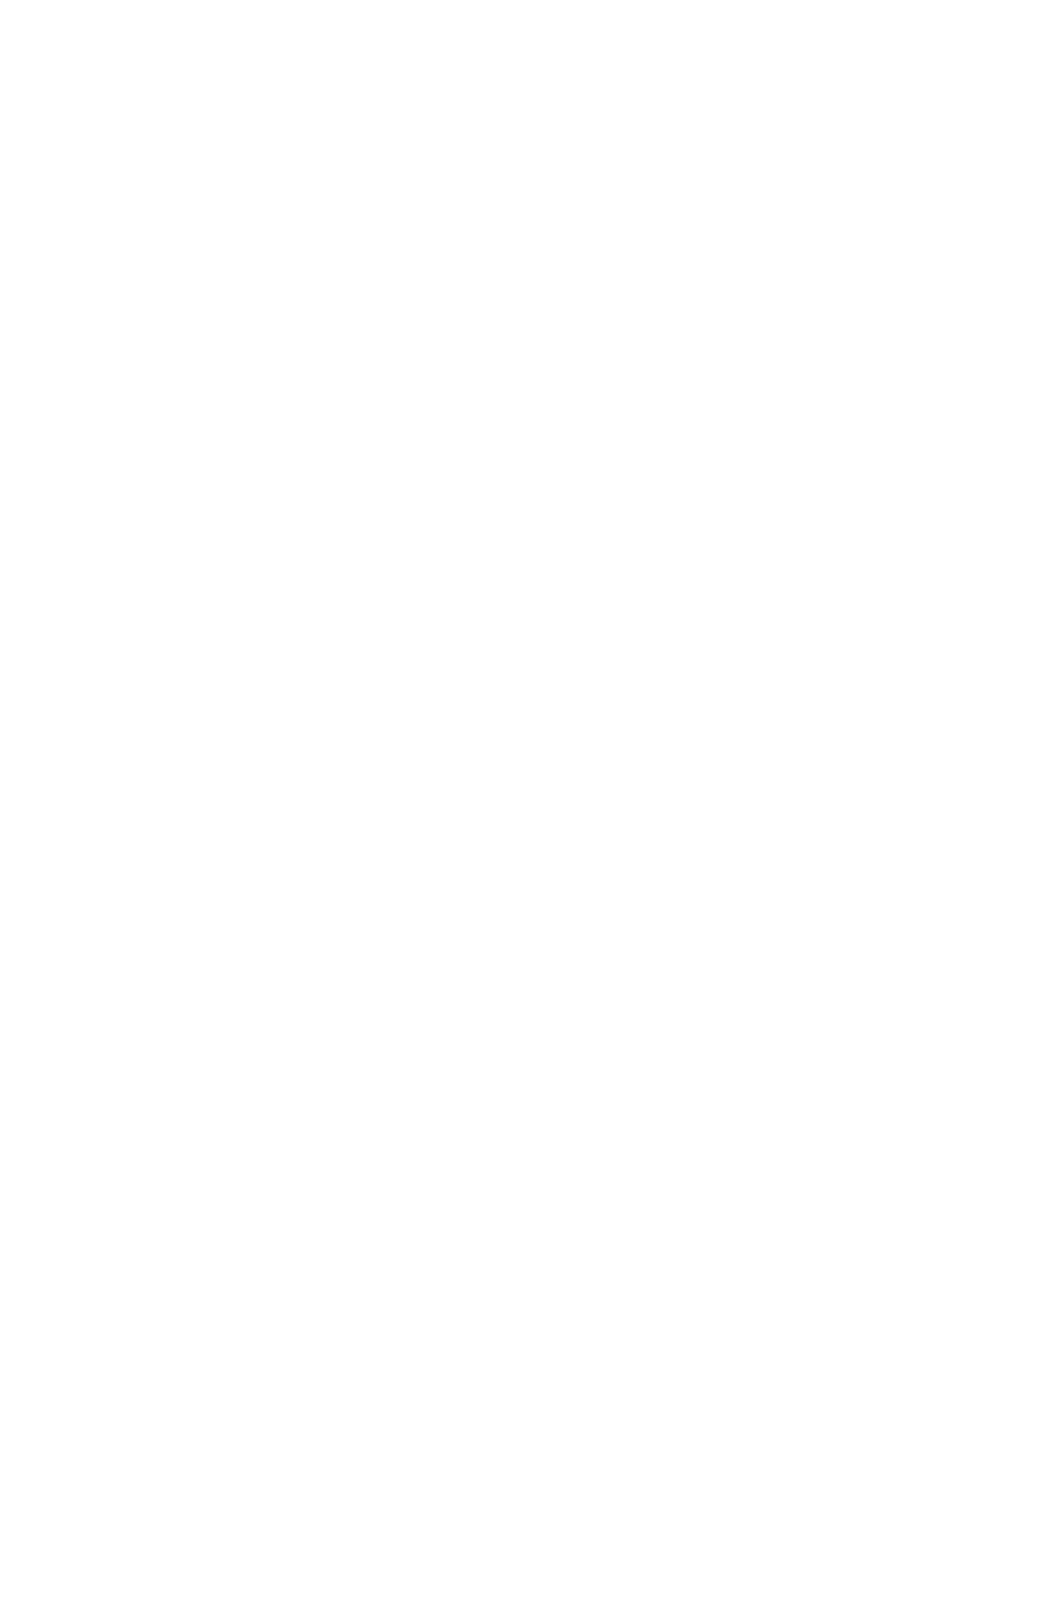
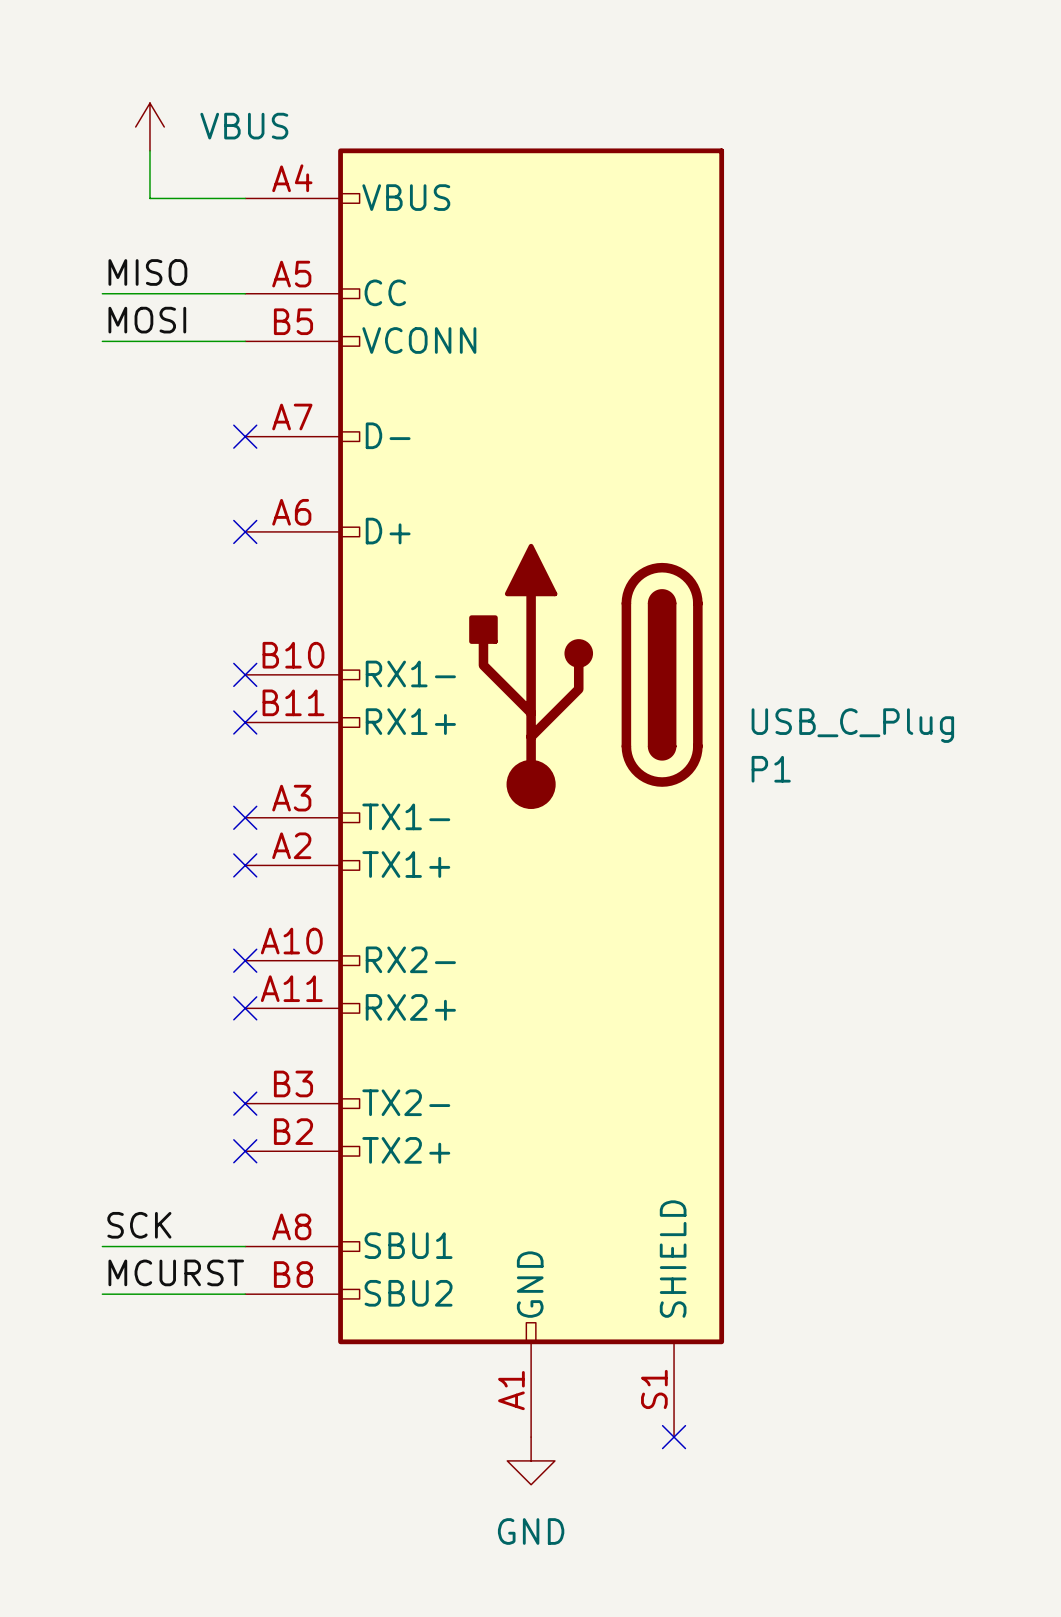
power symbol: none -> VBUS (149, 127)
wire: none -> (149, 150) (149, 198) (245, 198)
label: none -> MISO (147, 272)
wire: none -> (102, 293) (245, 293)
label: none -> MOSI (147, 320)
wire: none -> (102, 341) (245, 341)
no-connect mark: none -> (245, 436)
no-connect mark: none -> (245, 531)
no-connect mark: none -> (245, 674)
no-connect mark: none -> (245, 722)
P1: none -> USB_C_Plug (484, 792)
no-connect mark: none -> (245, 817)
no-connect mark: none -> (245, 865)
no-connect mark: none -> (245, 960)
no-connect mark: none -> (245, 1008)
no-connect mark: none -> (245, 1103)
no-connect mark: none -> (245, 1151)
label: none -> SCK (139, 1225)
wire: none -> (102, 1246) (245, 1246)
label: none -> MCURST (176, 1272)
wire: none -> (102, 1294) (245, 1294)
no-connect mark: none -> (674, 1437)
power symbol: none -> GND (531, 1460)

